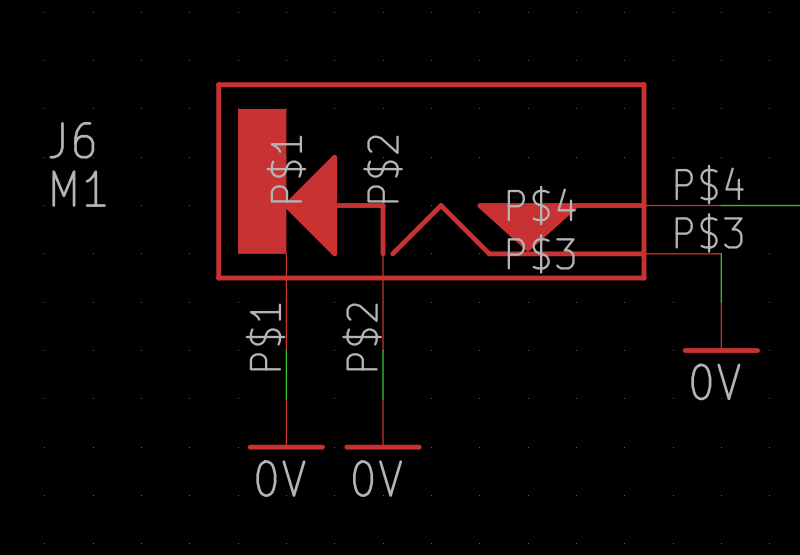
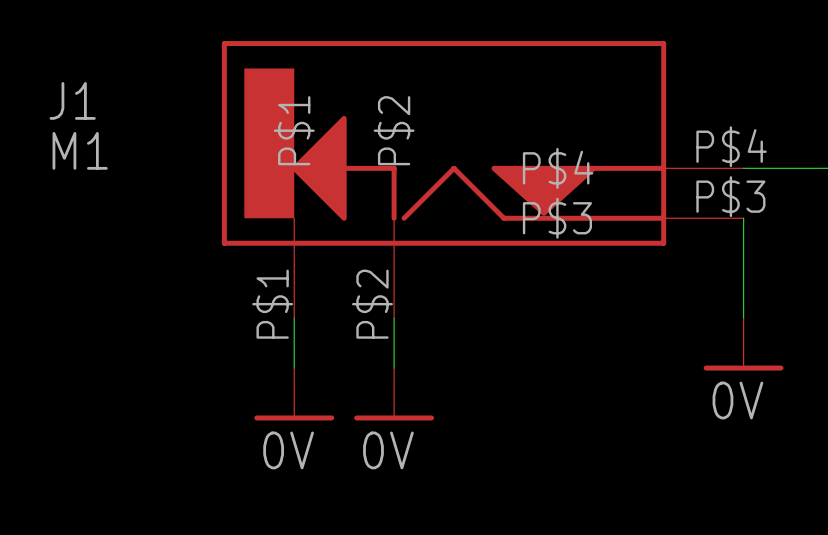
J6 name: J6 (71, 140) -> J1 (72, 100)
power symbol position: 0V (721, 327) -> 0V (743, 344)

